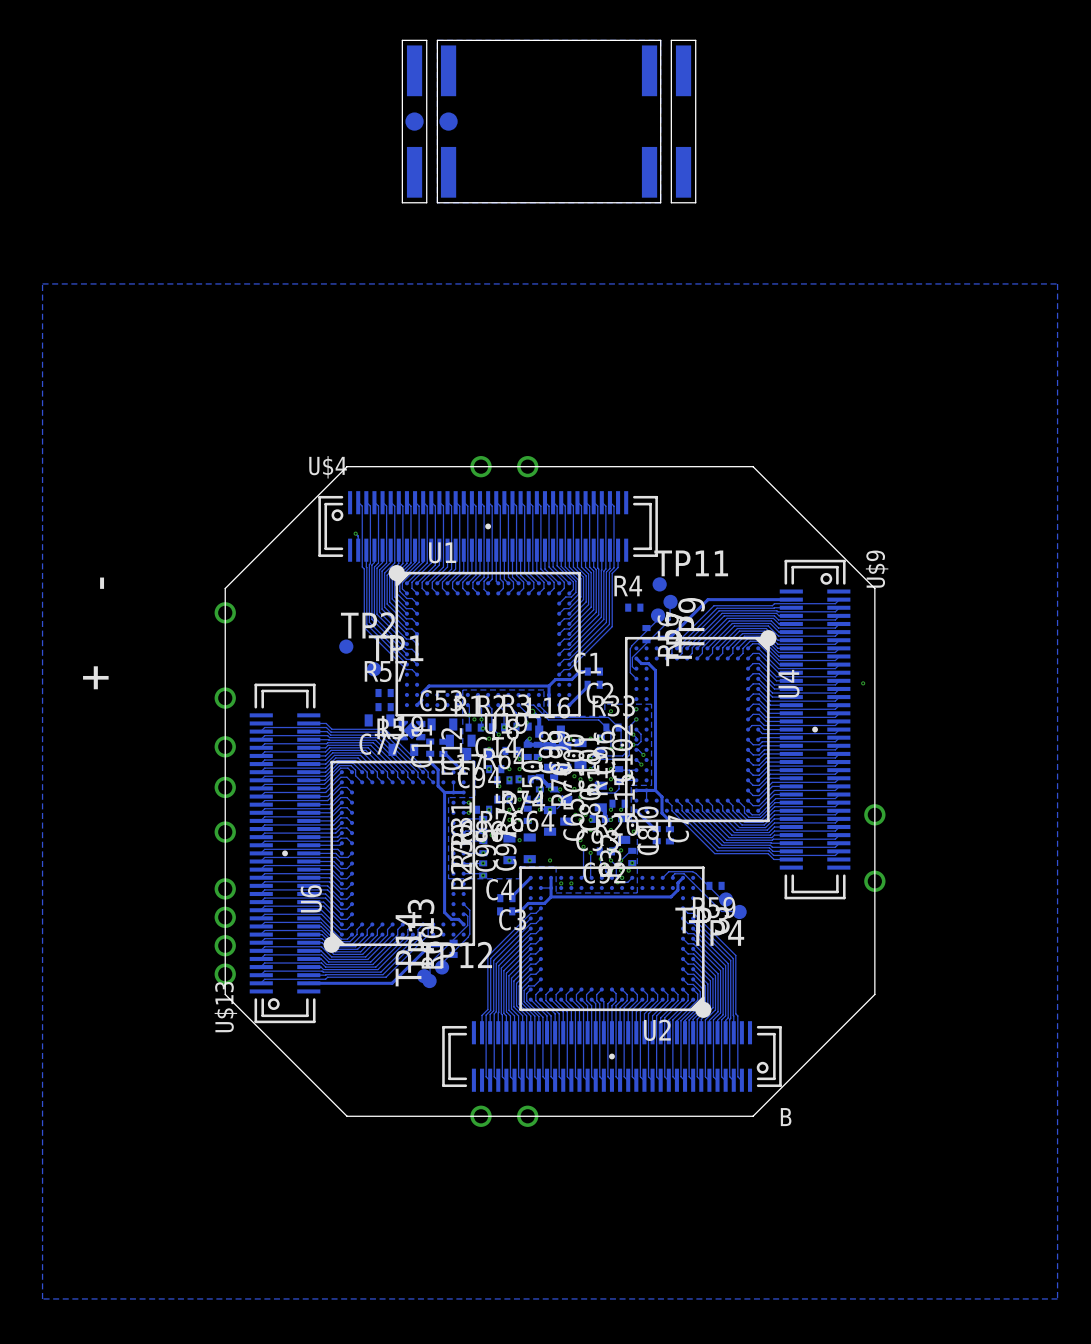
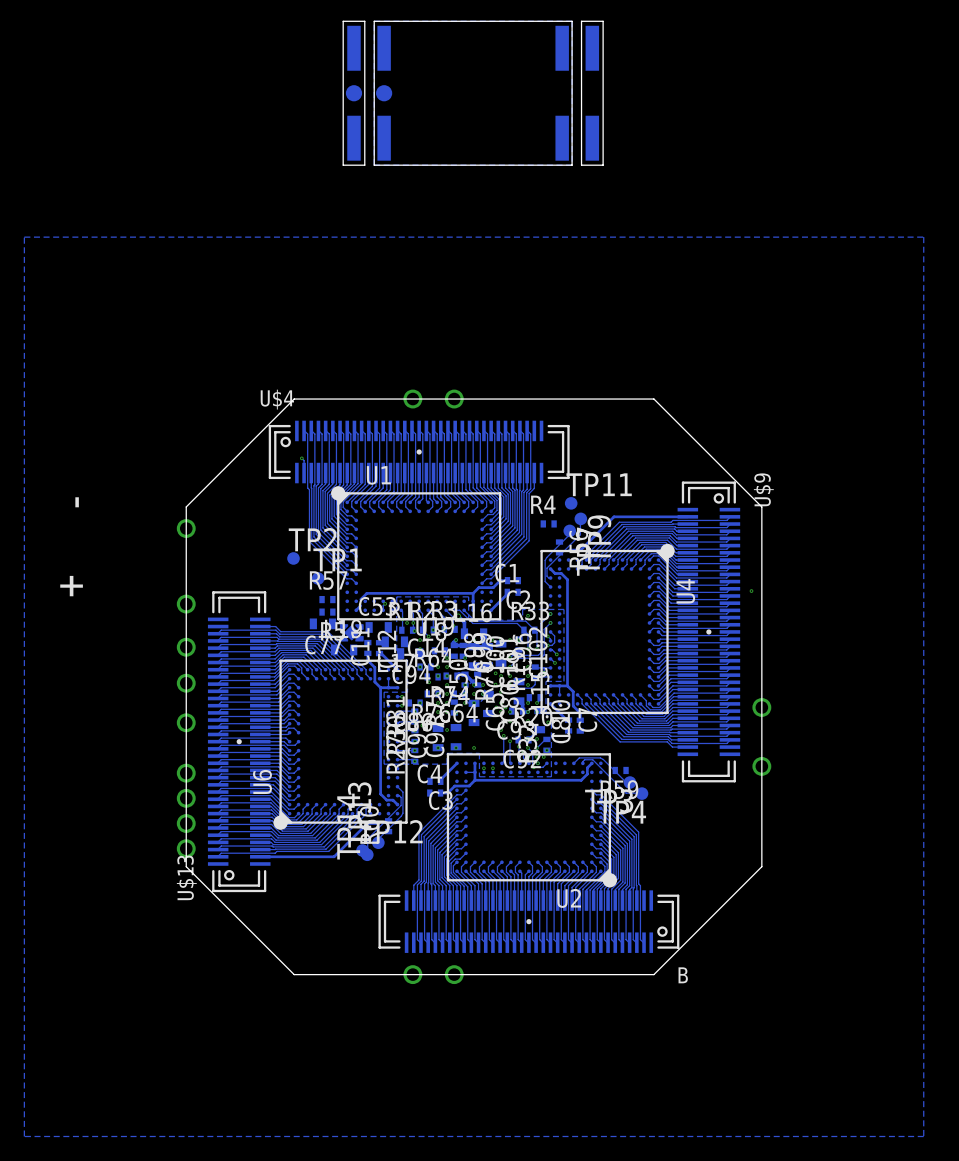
track: none -> (385, 603) (383, 610)
via: none -> (385, 603)

